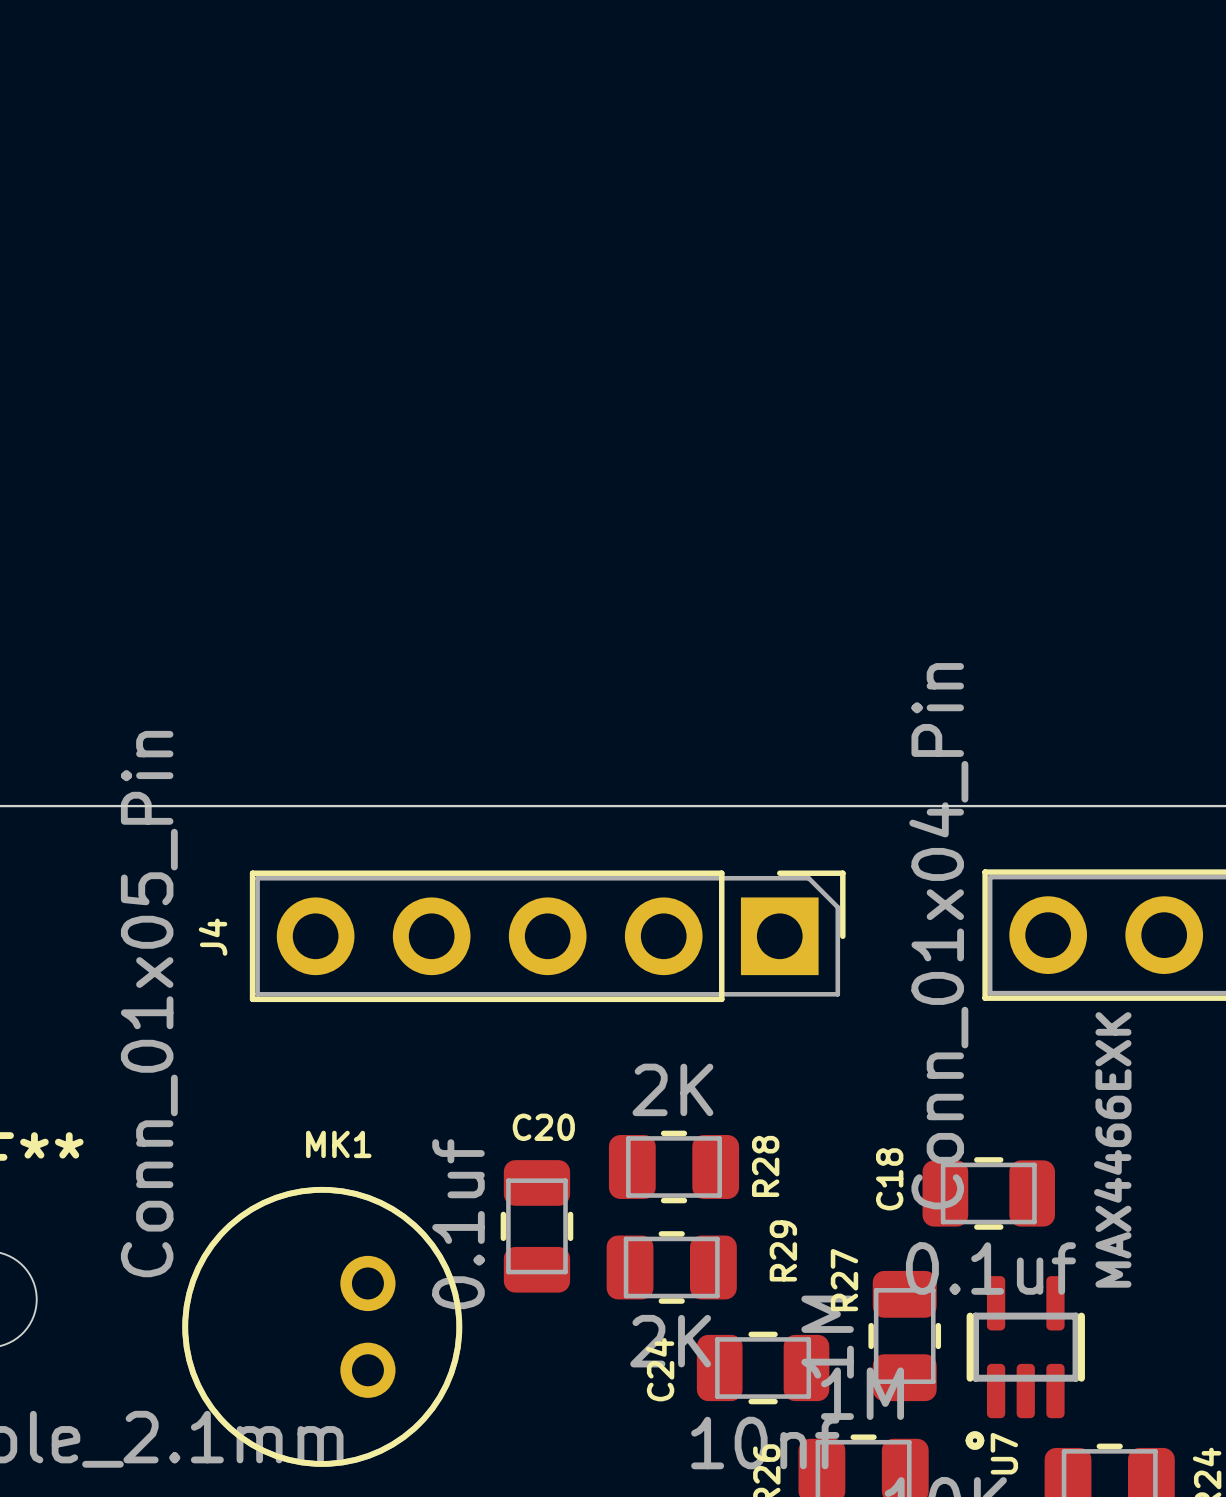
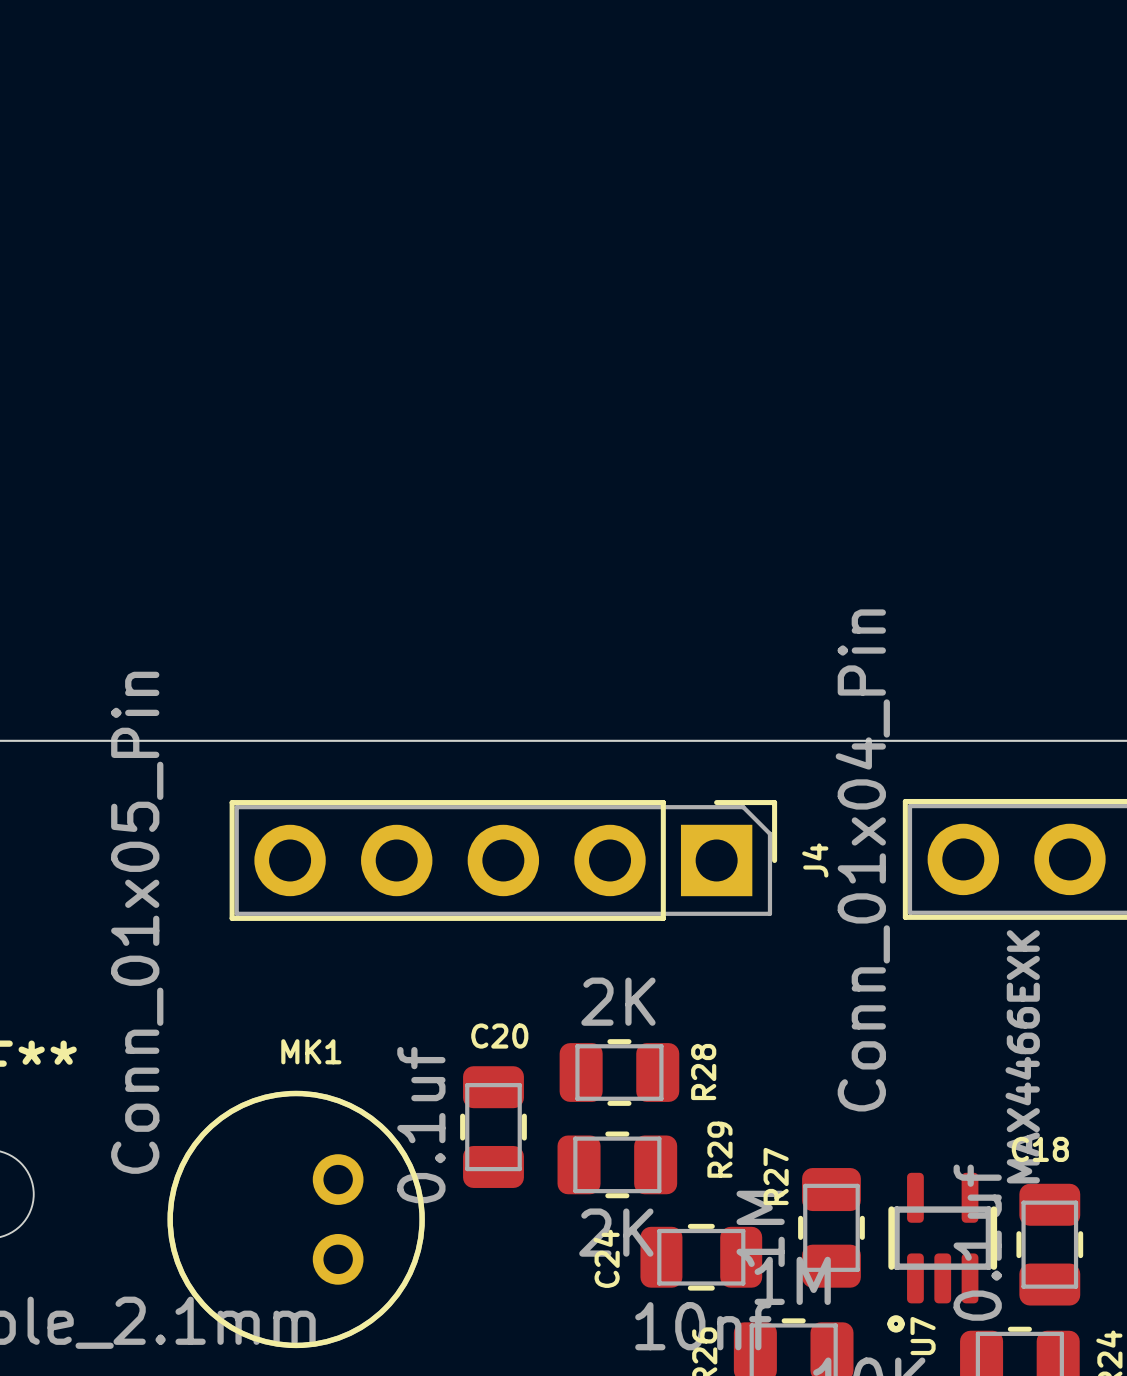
J4 name position: J4 (213, 937) -> J4 (815, 860)
C18 rotation: 0° (988, 1193) -> 90° clockwise (1049, 1244)
C18 position: (988, 1193) -> (1049, 1244)

